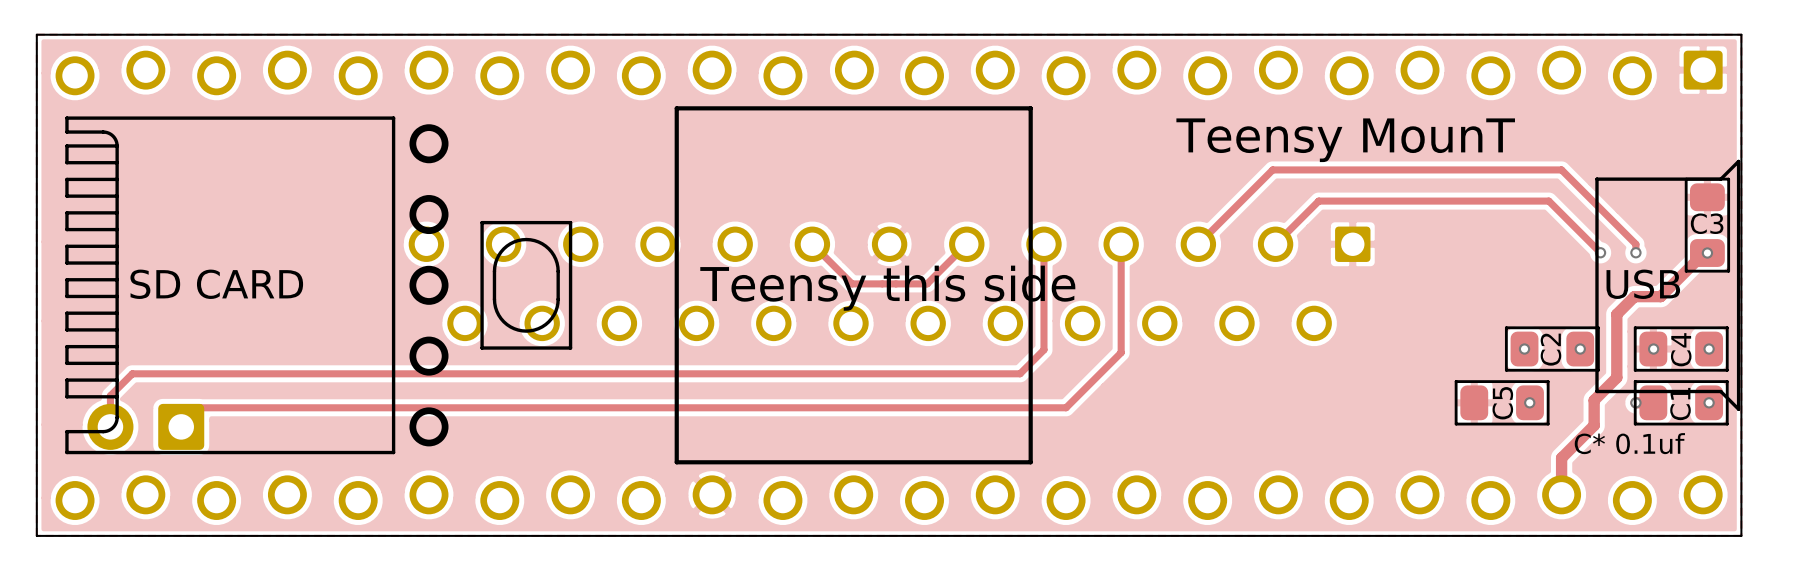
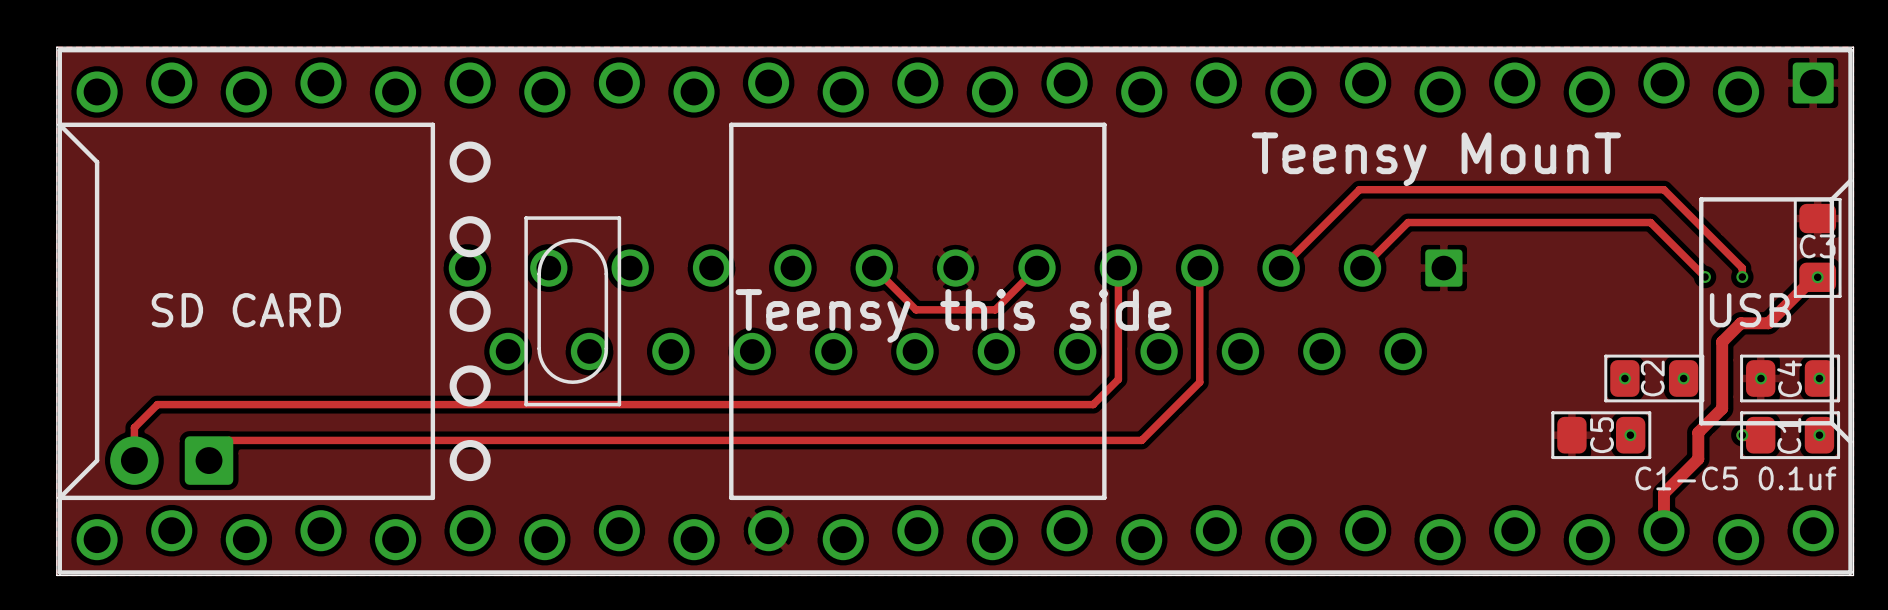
part footprint: [55, 50, 1741, 520] -> [57, 47, 1853, 575]
text: C* 0.1uf (1629, 443) -> C1-C5 0.1uf (1735, 478)

